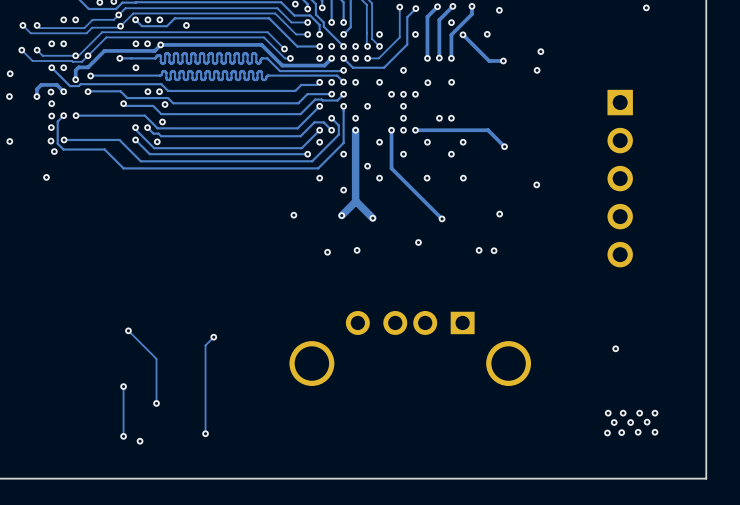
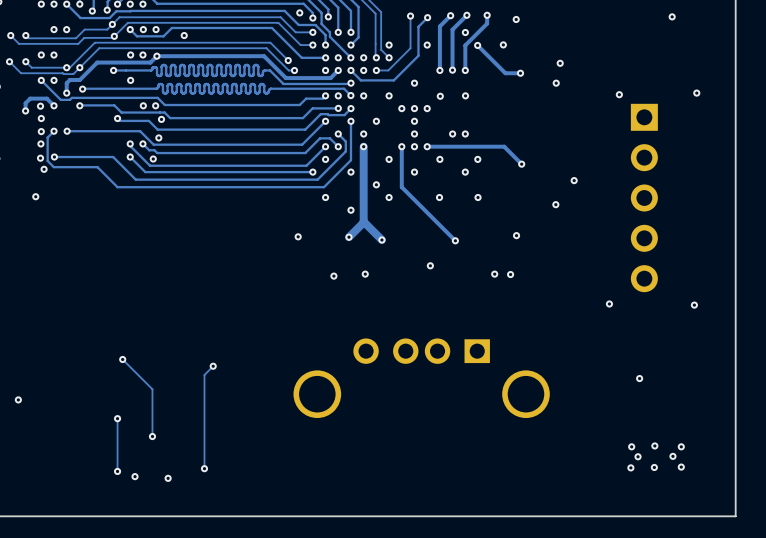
via: none -> (696, 93)
via: none -> (619, 94)
via: none -> (574, 180)
via: none -> (609, 303)
via: none -> (694, 305)
via: none -> (18, 399)
via: none -> (654, 445)
via: (623, 413) -> none
via: (639, 413) -> none
via: (630, 422) -> none
via: (621, 432) -> none
via: none -> (654, 467)
via: (638, 432) -> none
via: none -> (168, 478)

